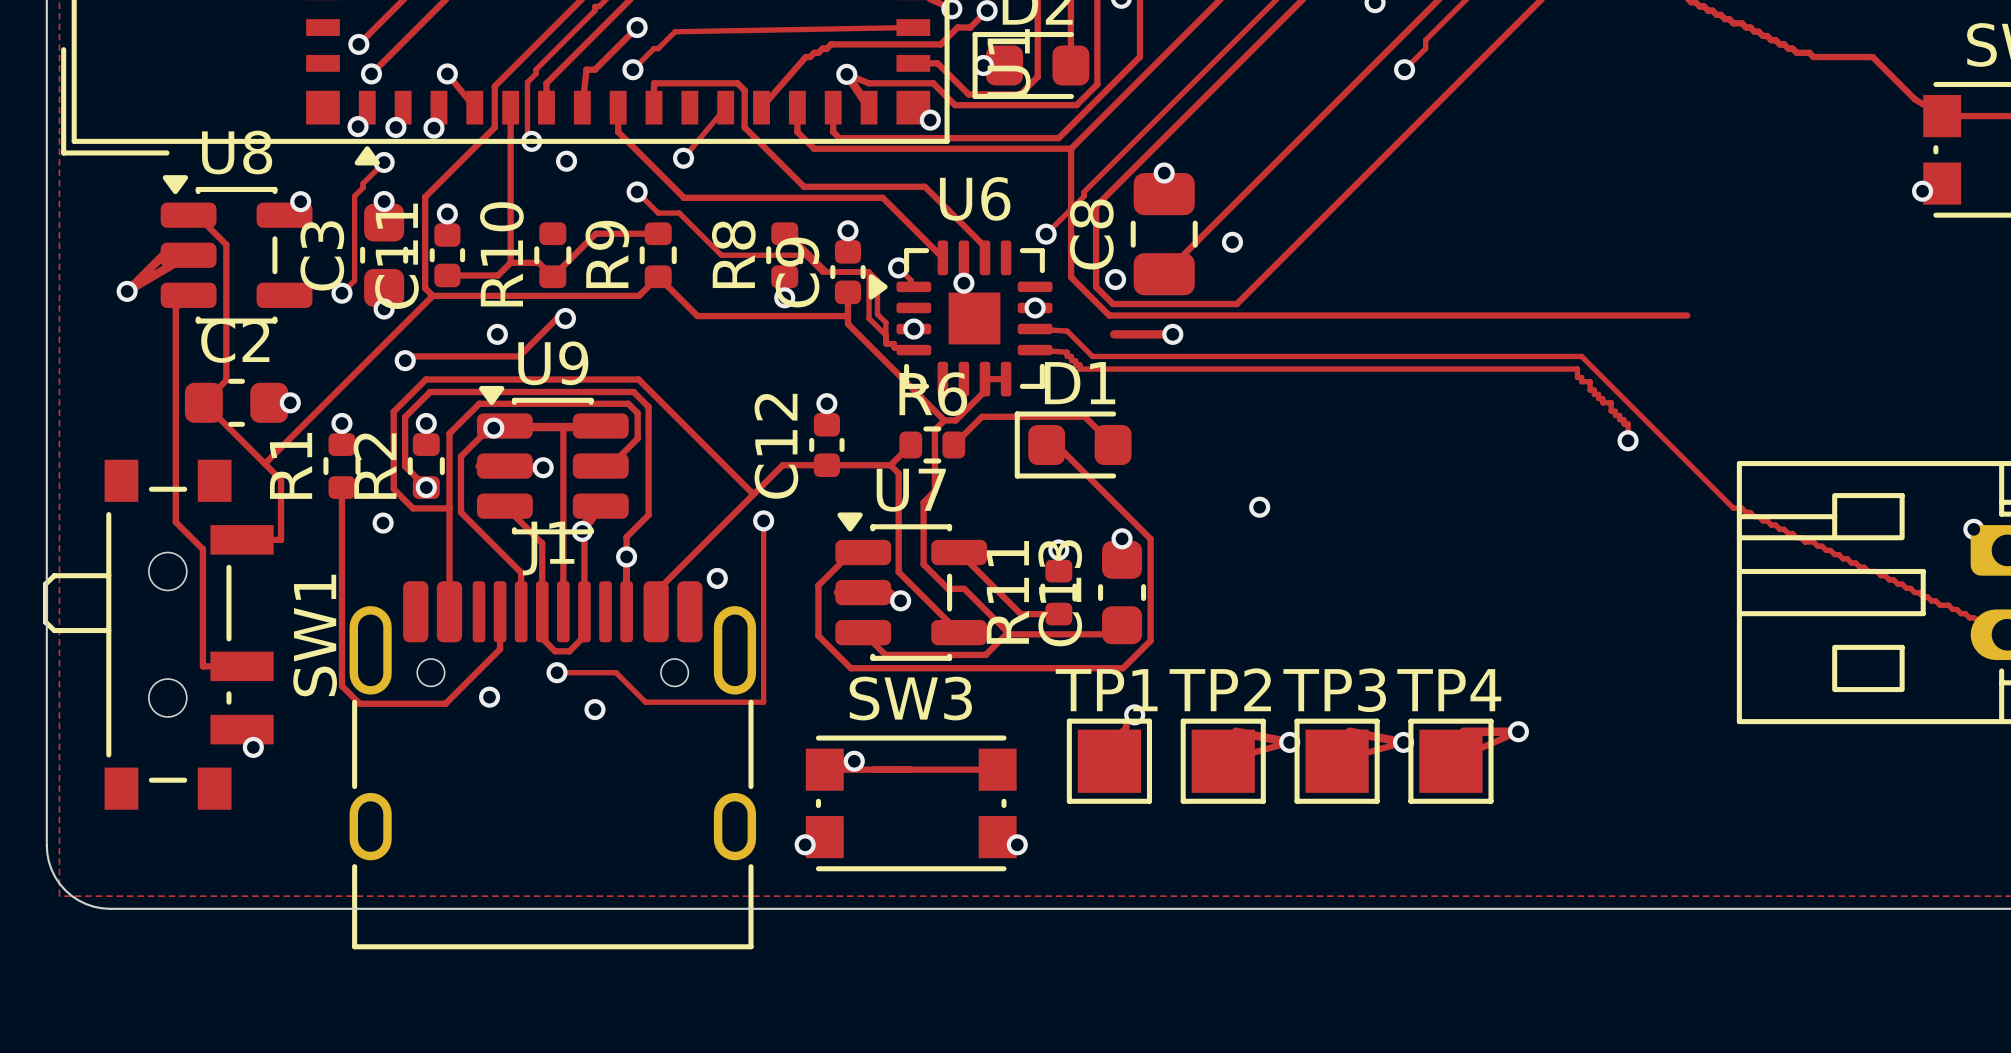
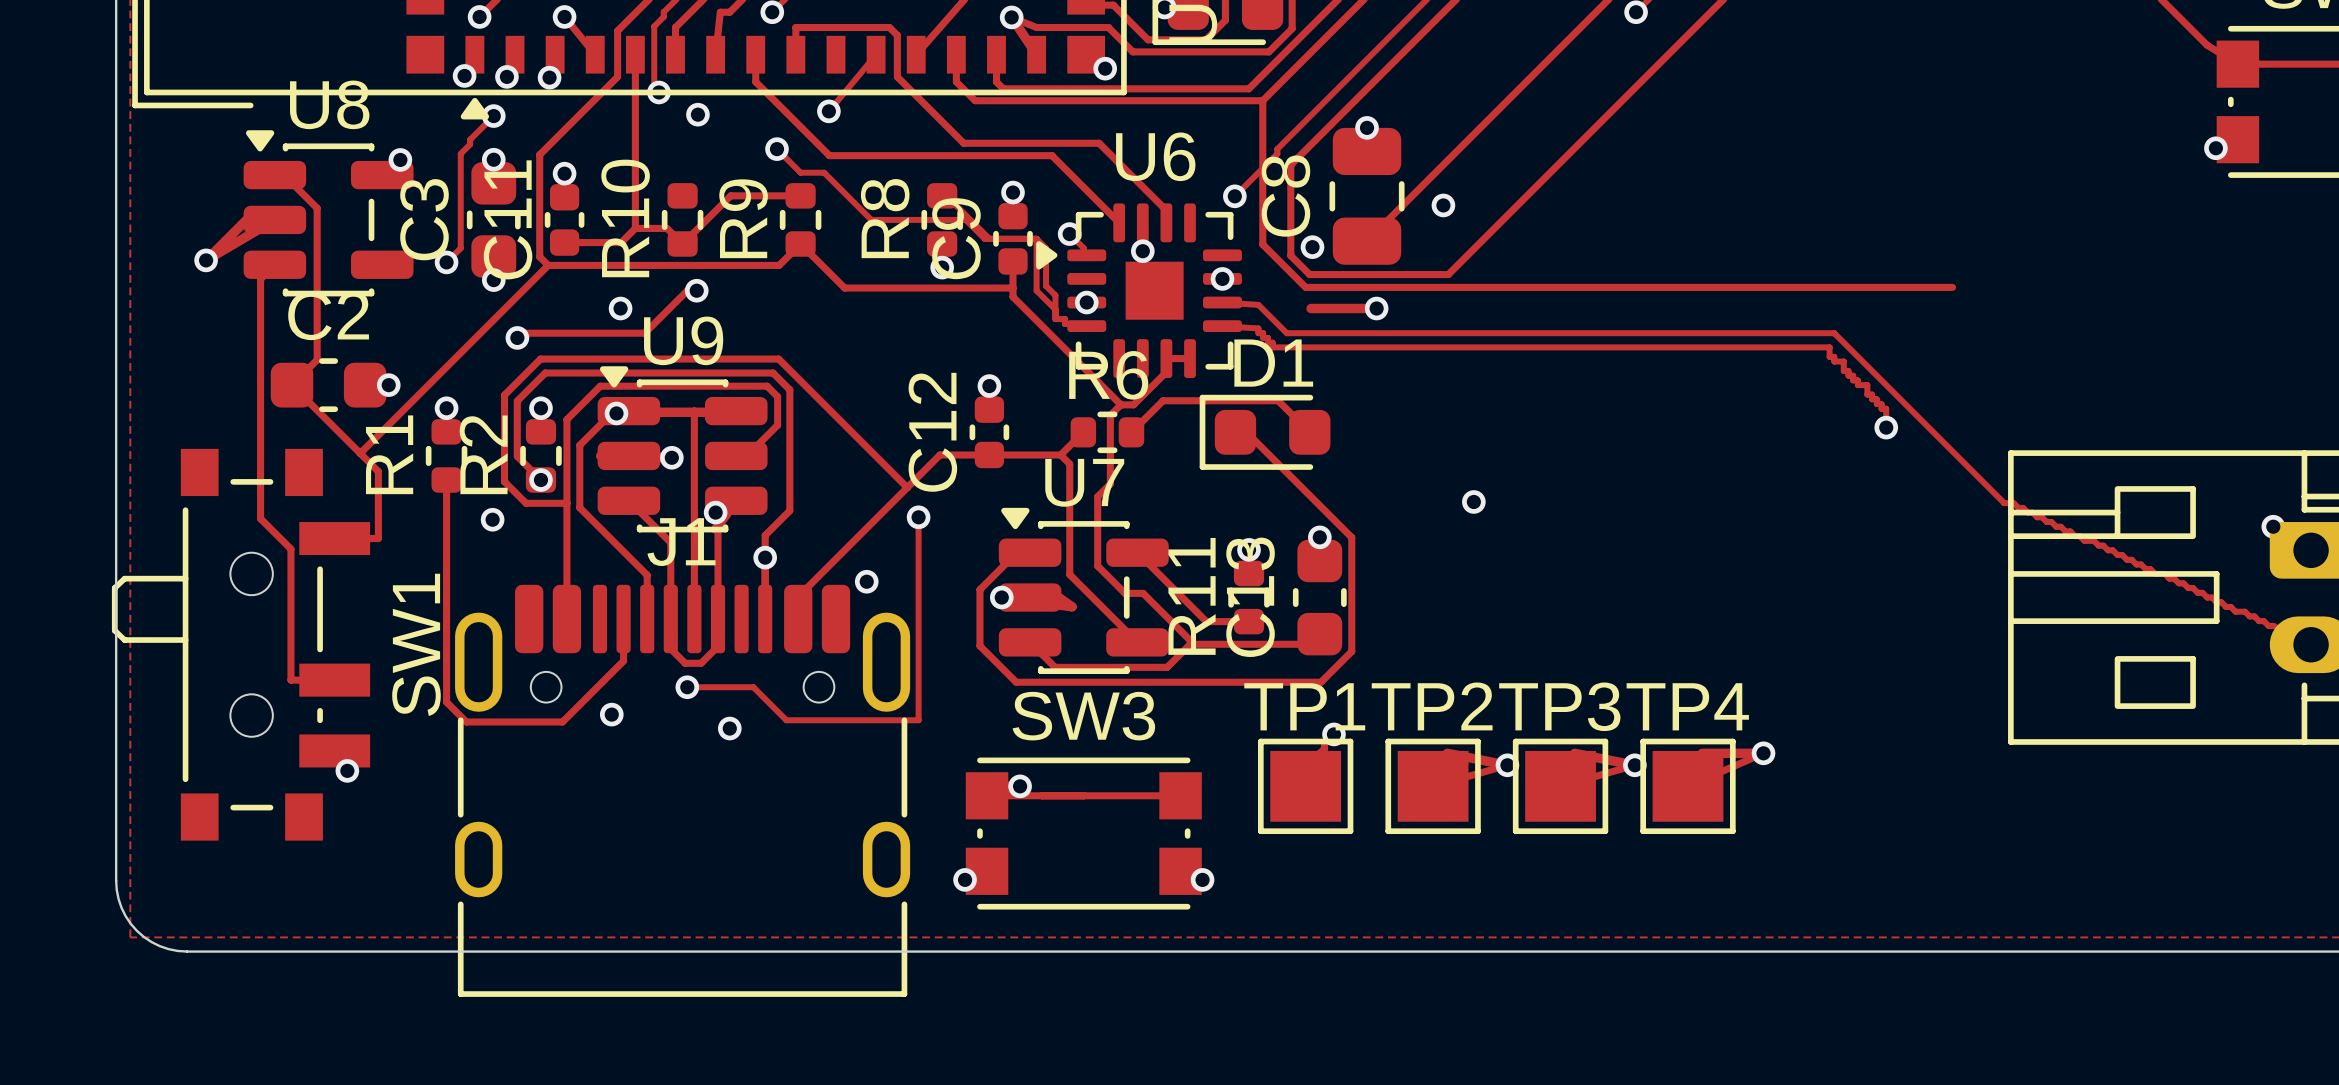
via position: (582, 531) -> (715, 512)
via position: (900, 600) -> (1001, 597)

